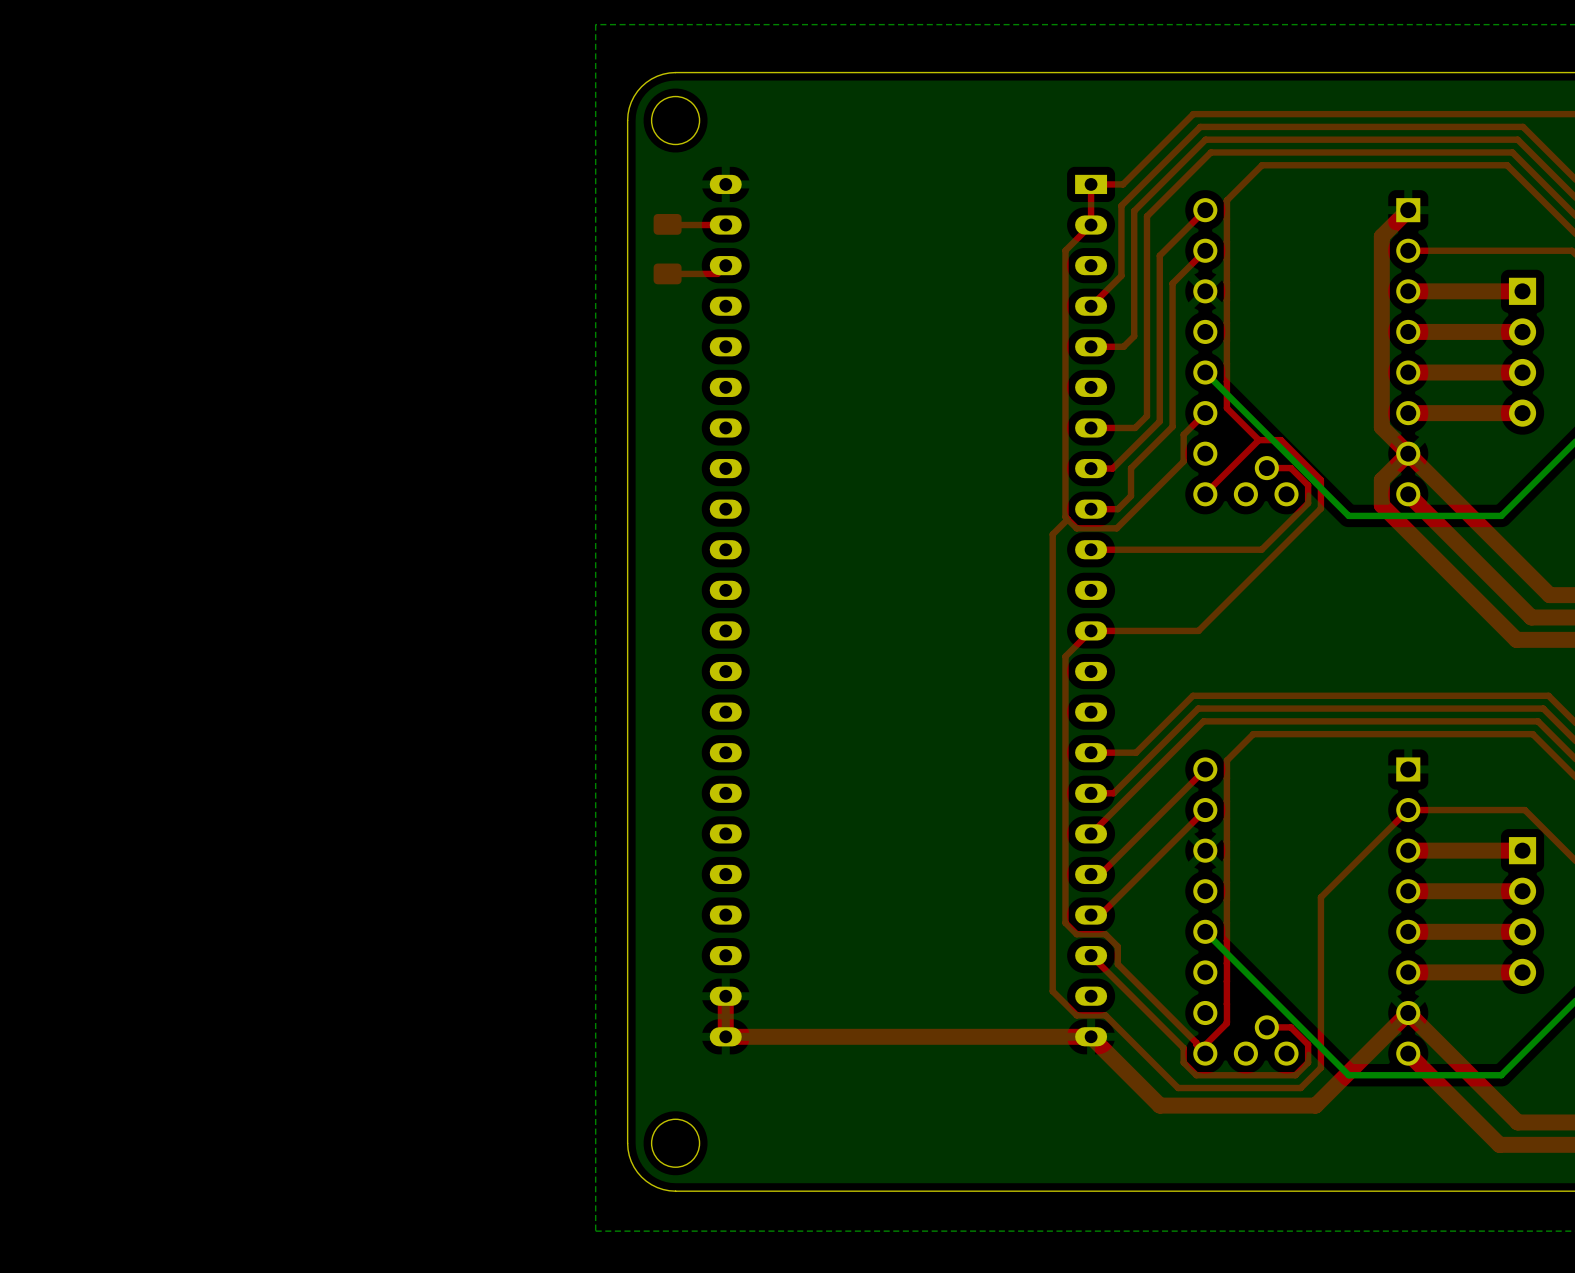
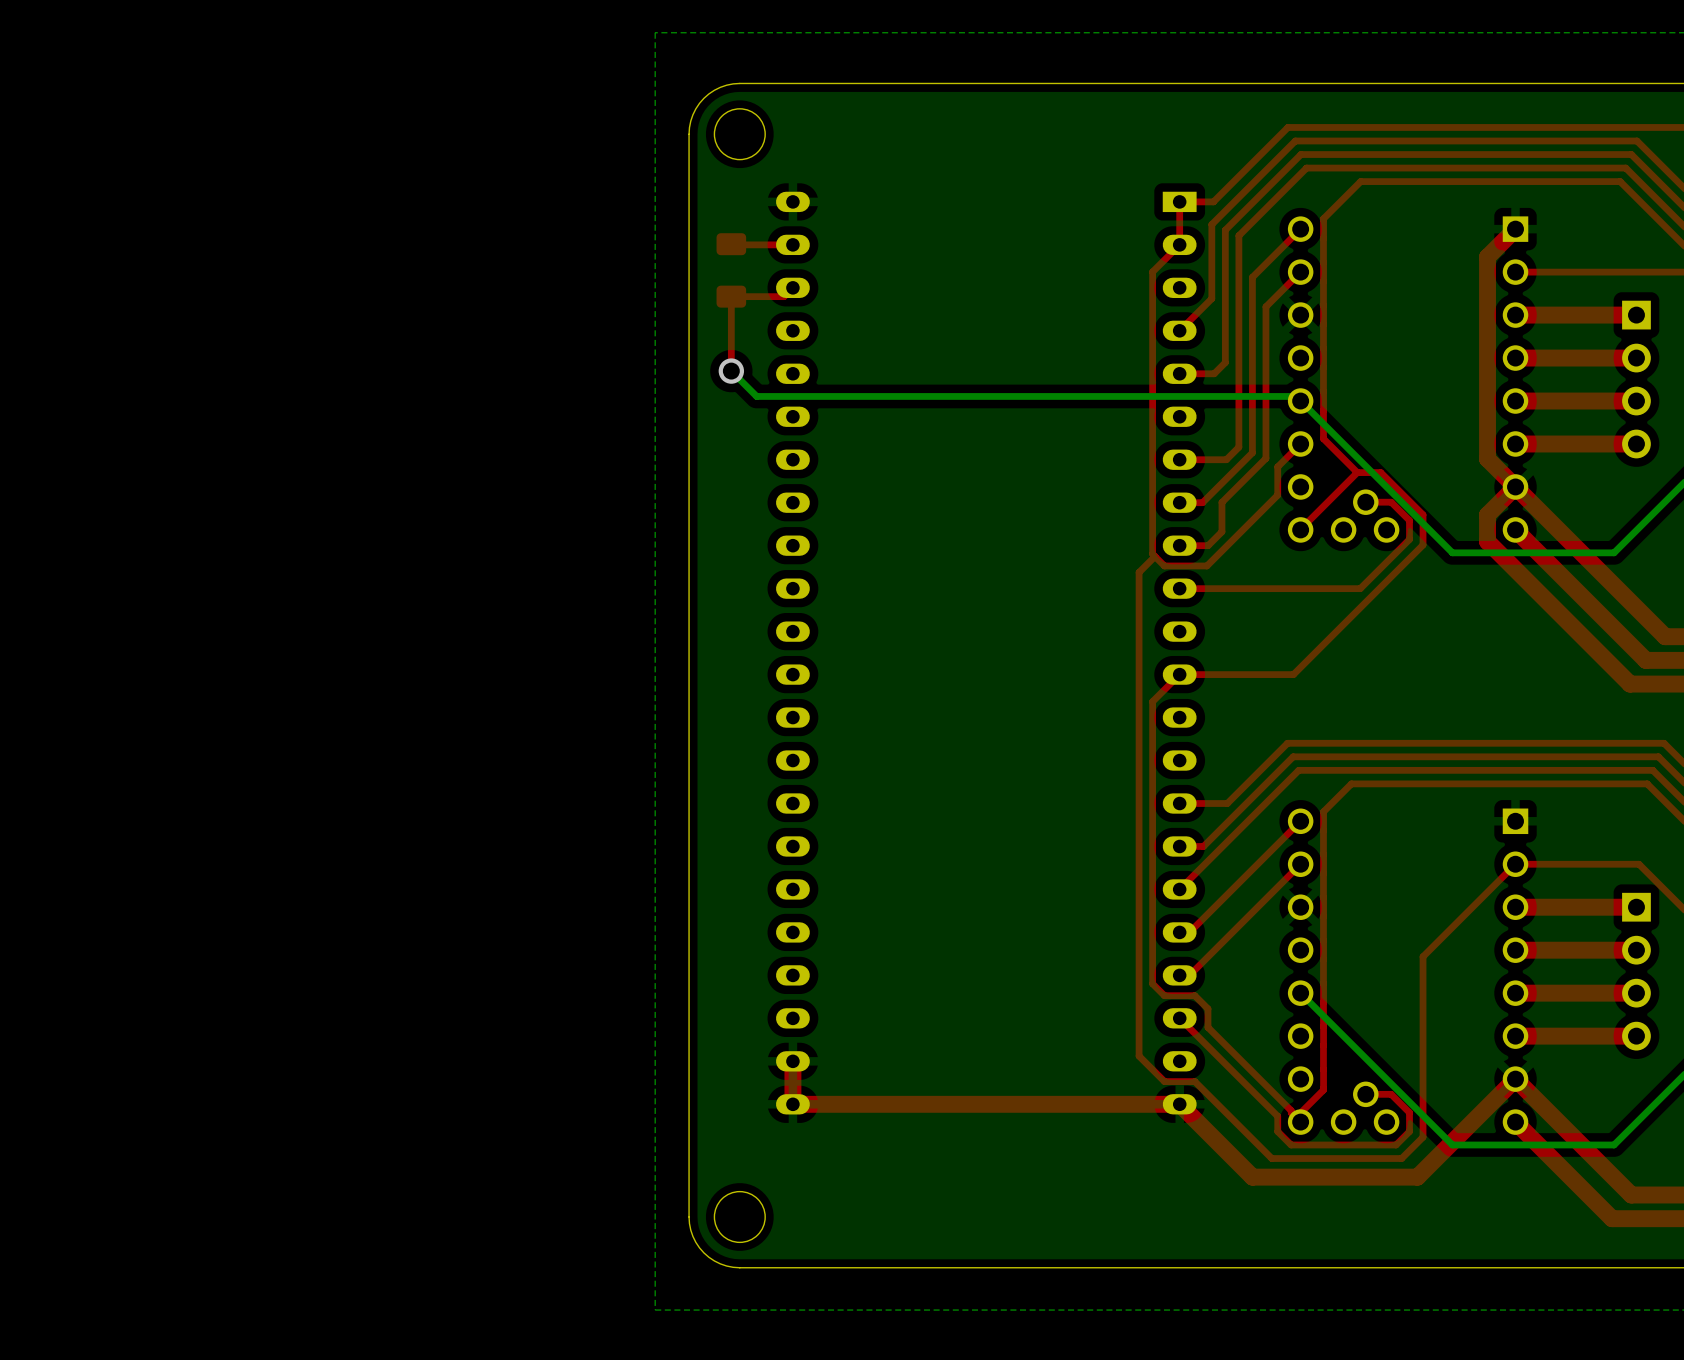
top track: none -> (731, 296) (731, 371)
bottom track: none -> (731, 371) (756, 396) (1296, 396) (1300, 401)
via: none -> (731, 371)

